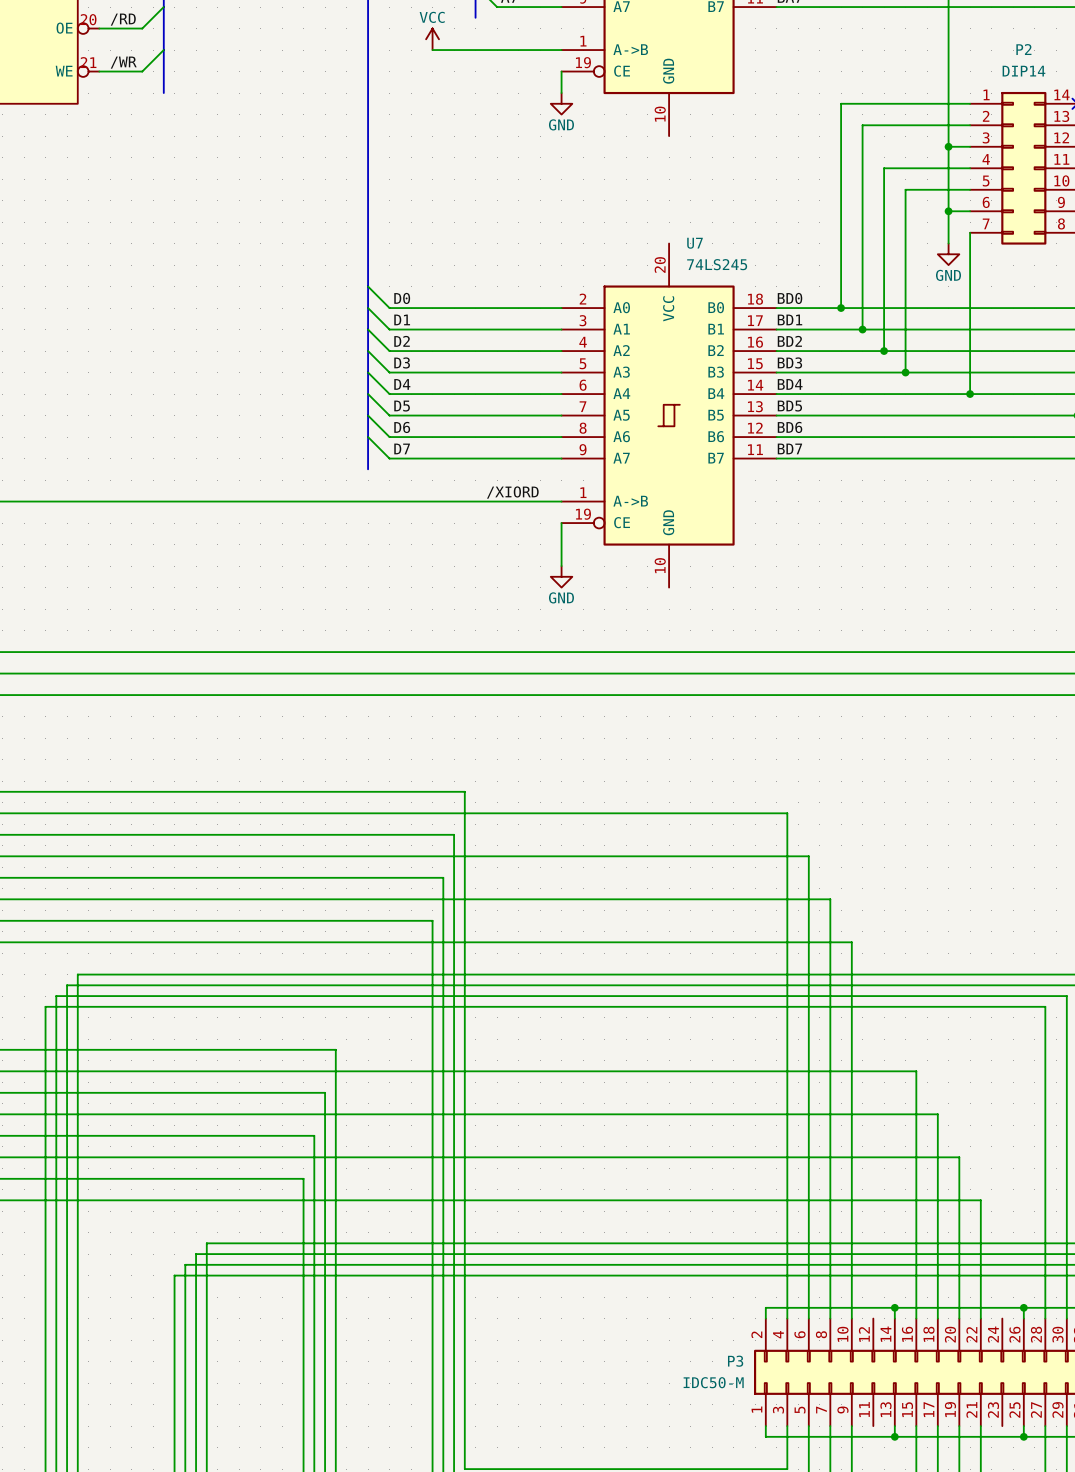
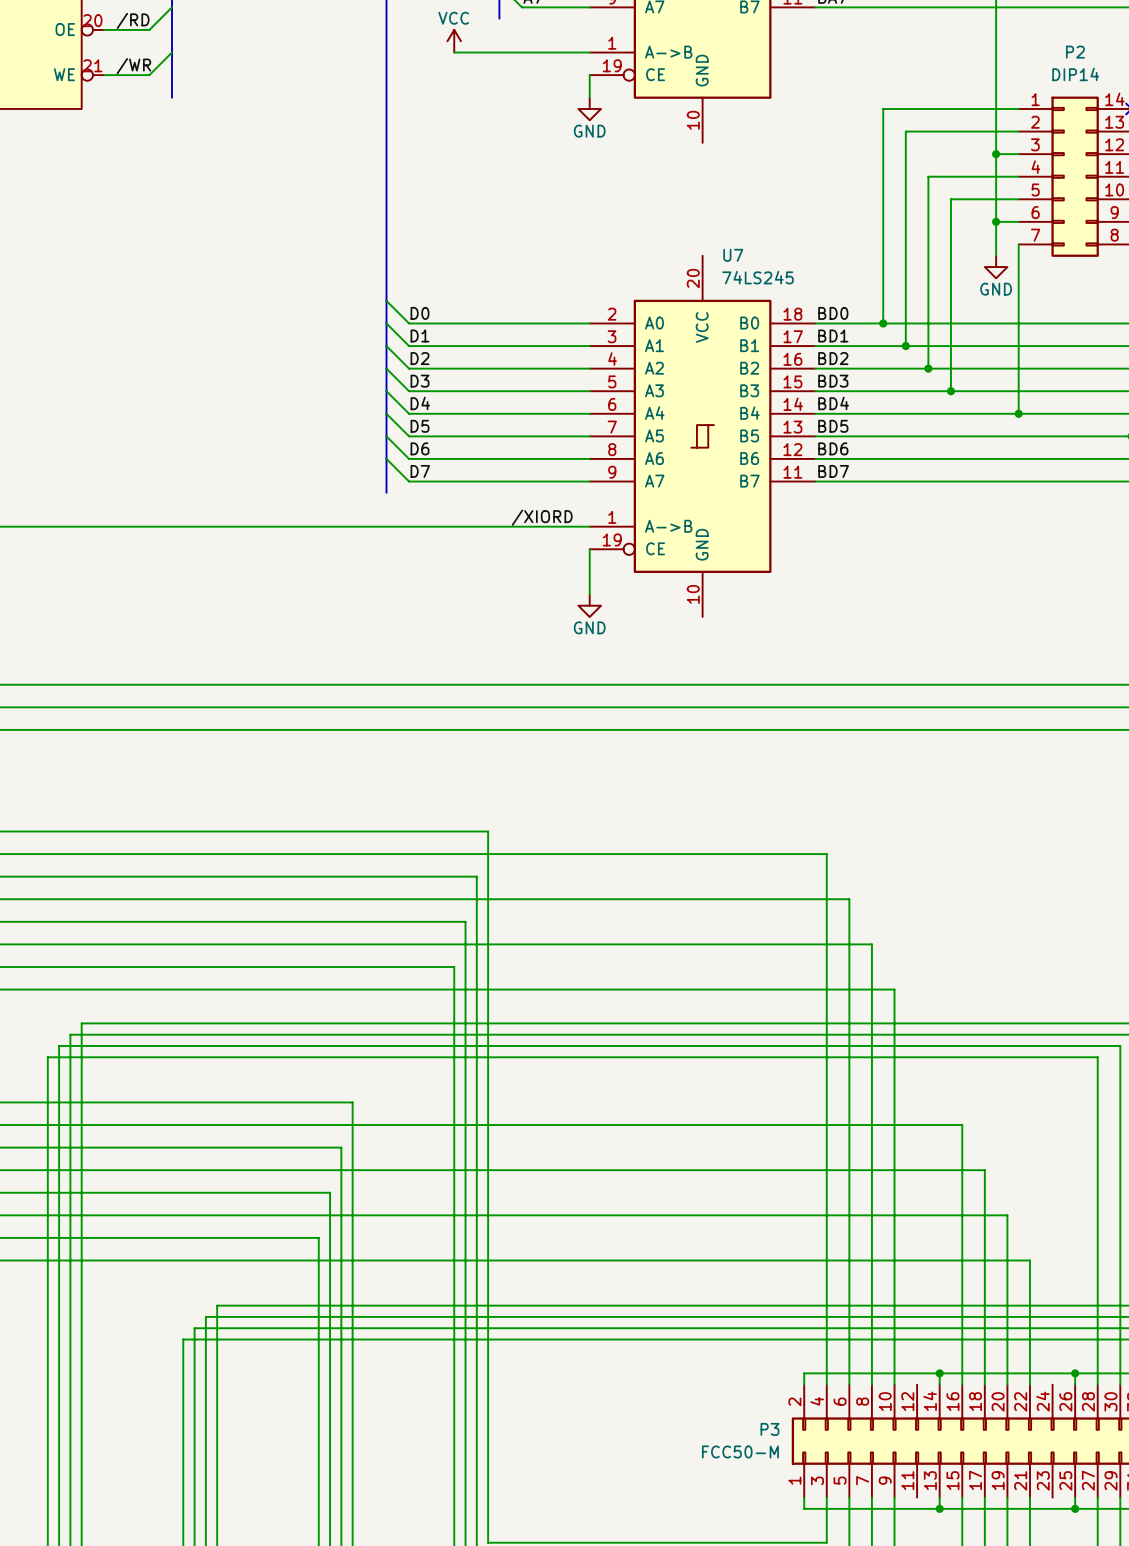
P3 value: IDC50-M (713, 1382) -> FCC50-M (740, 1451)

